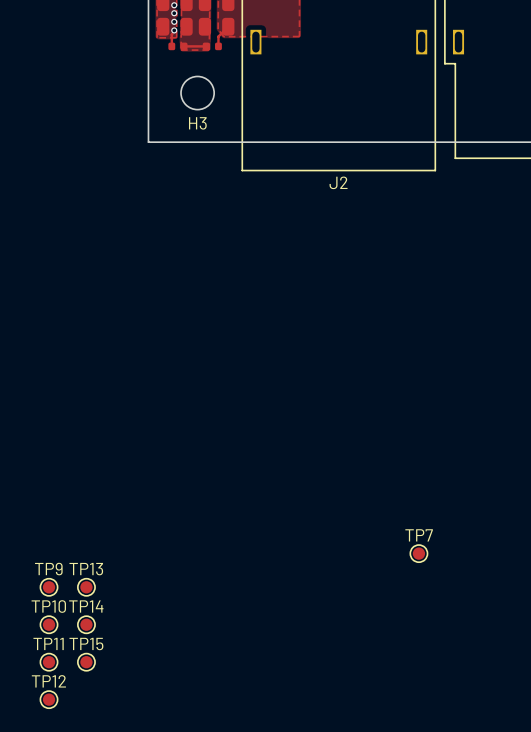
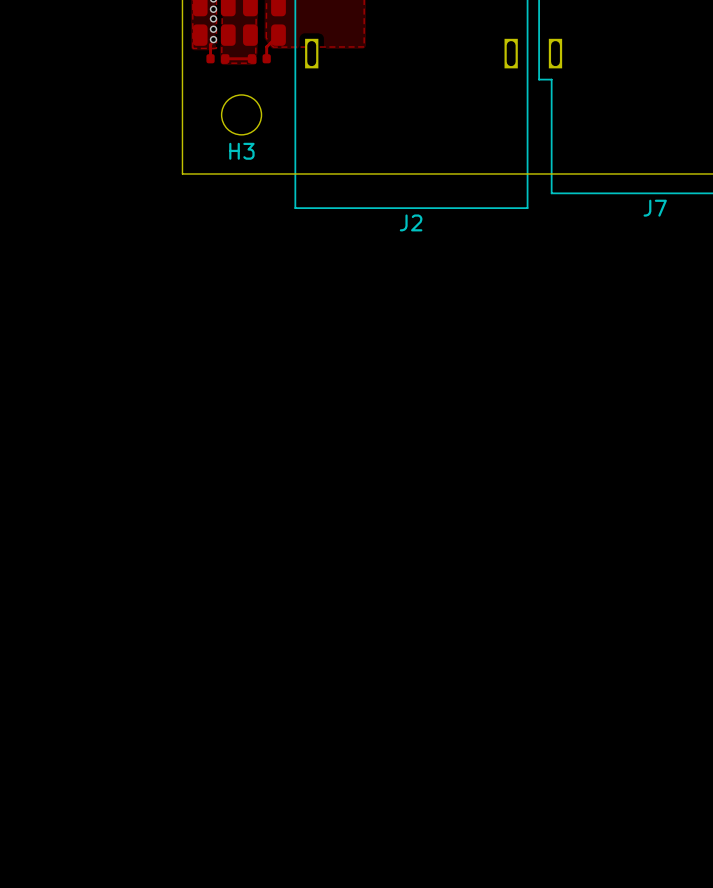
TP7: (418, 553) -> none
TP9: (49, 587) -> none
TP13: (86, 587) -> none
TP10: (49, 624) -> none
TP14: (86, 624) -> none
TP11: (49, 662) -> none
TP15: (86, 662) -> none
TP12: (49, 699) -> none

